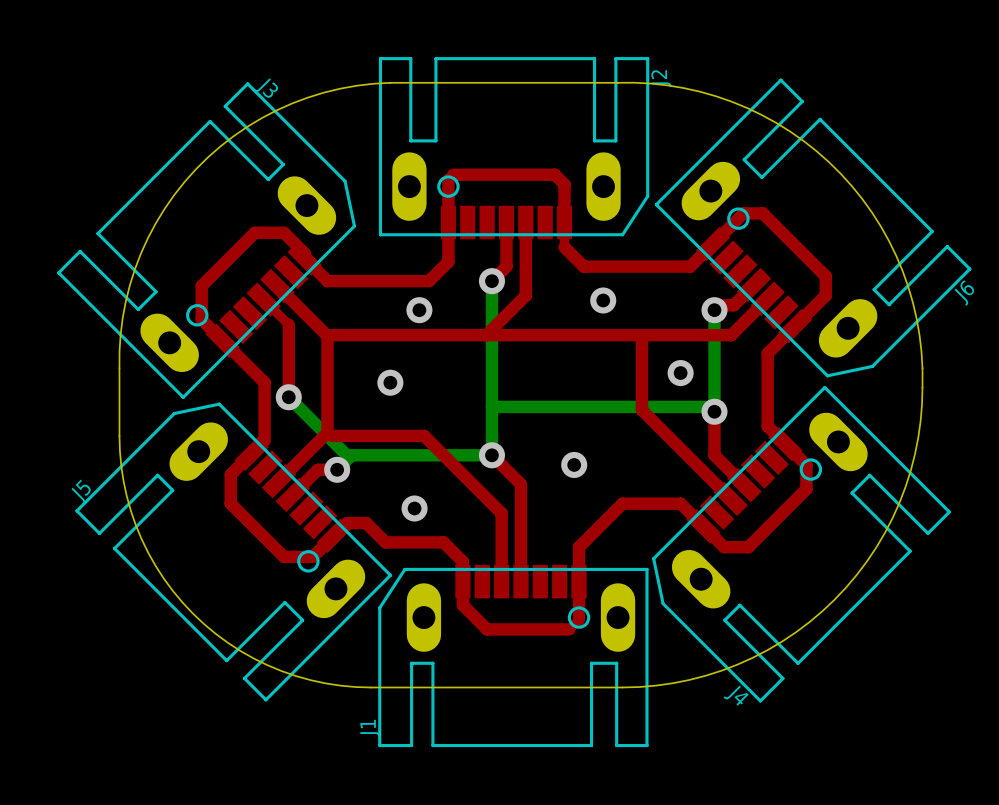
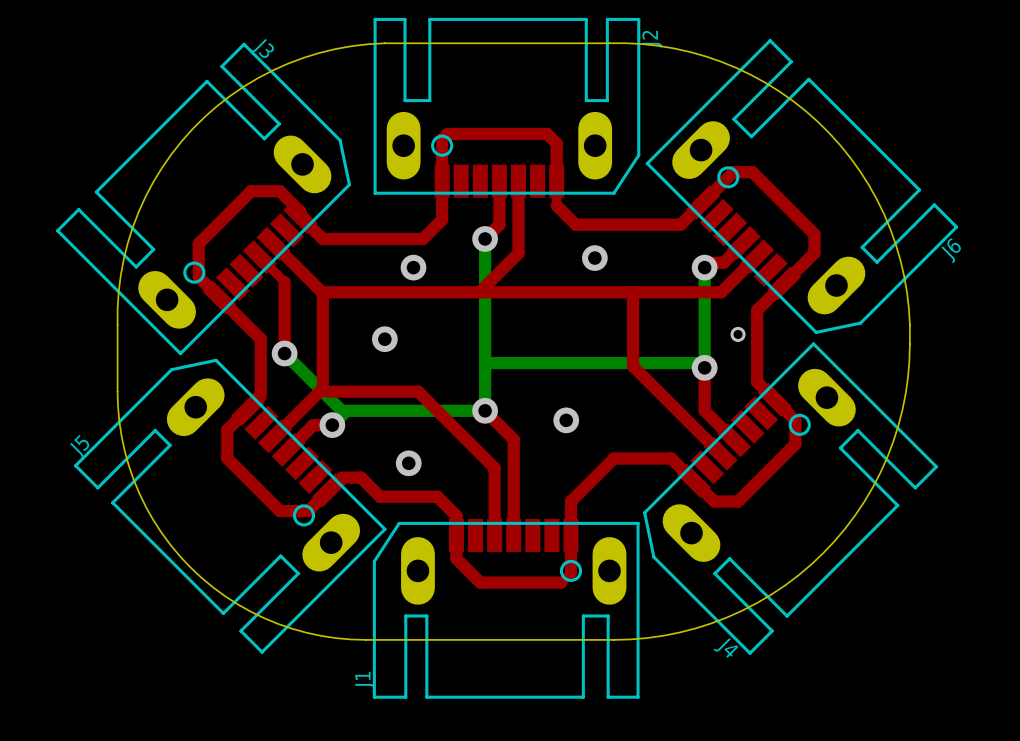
via: (680, 373) -> none
via: none -> (738, 334)

